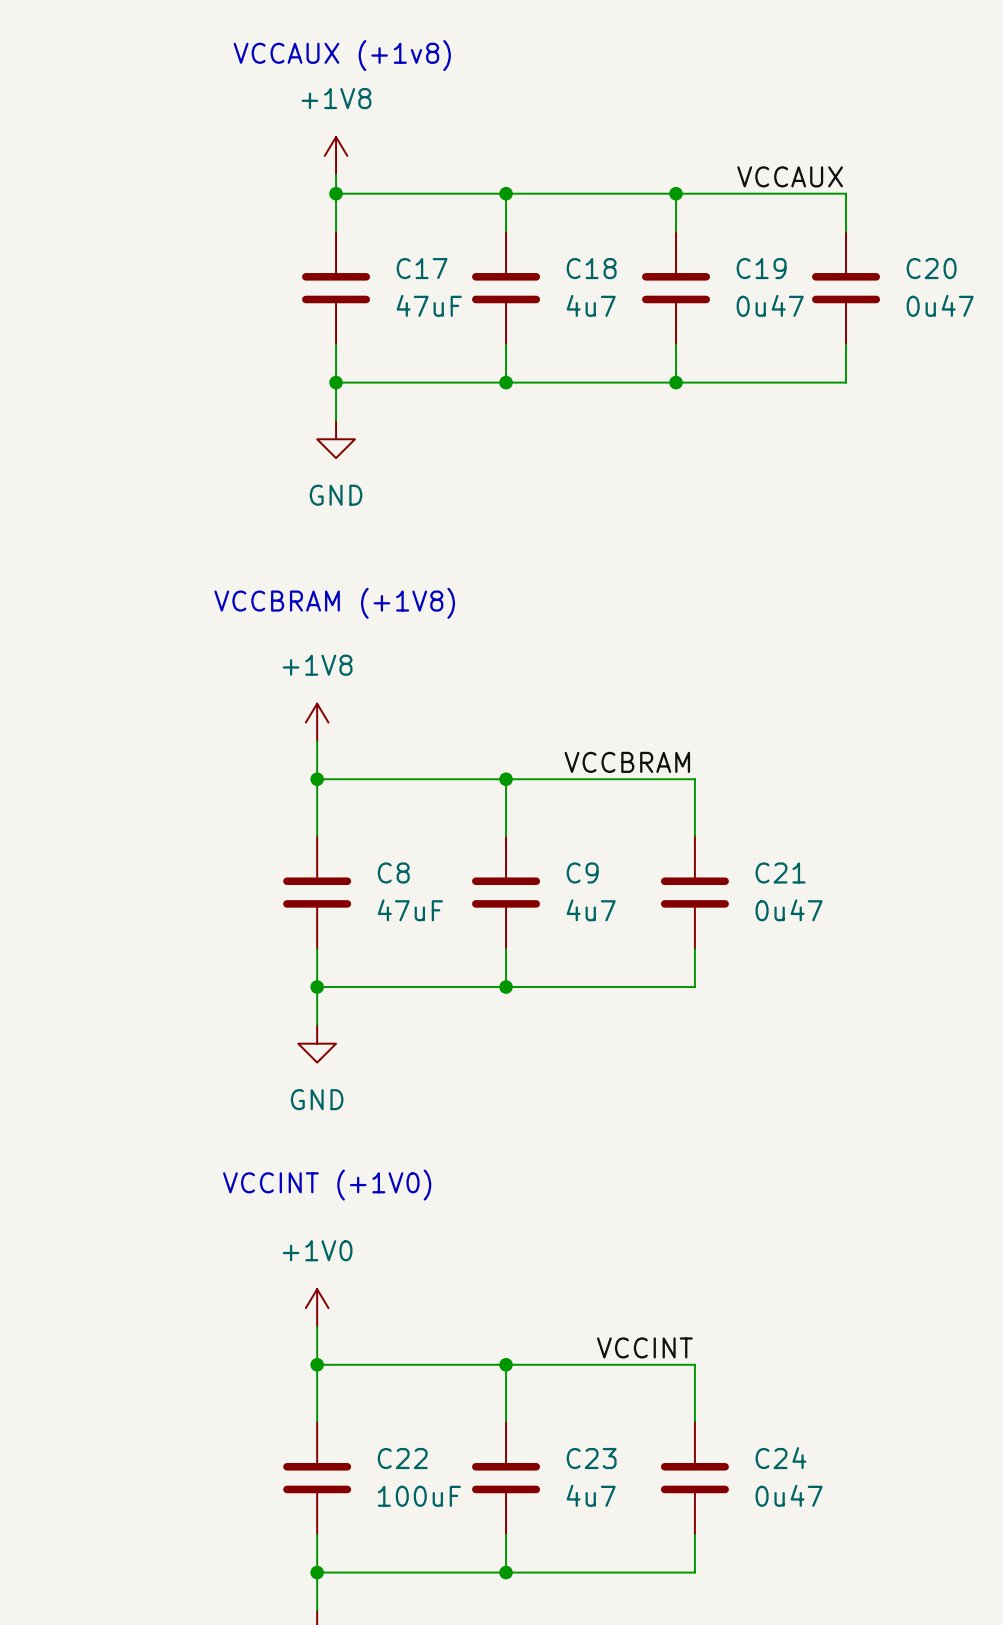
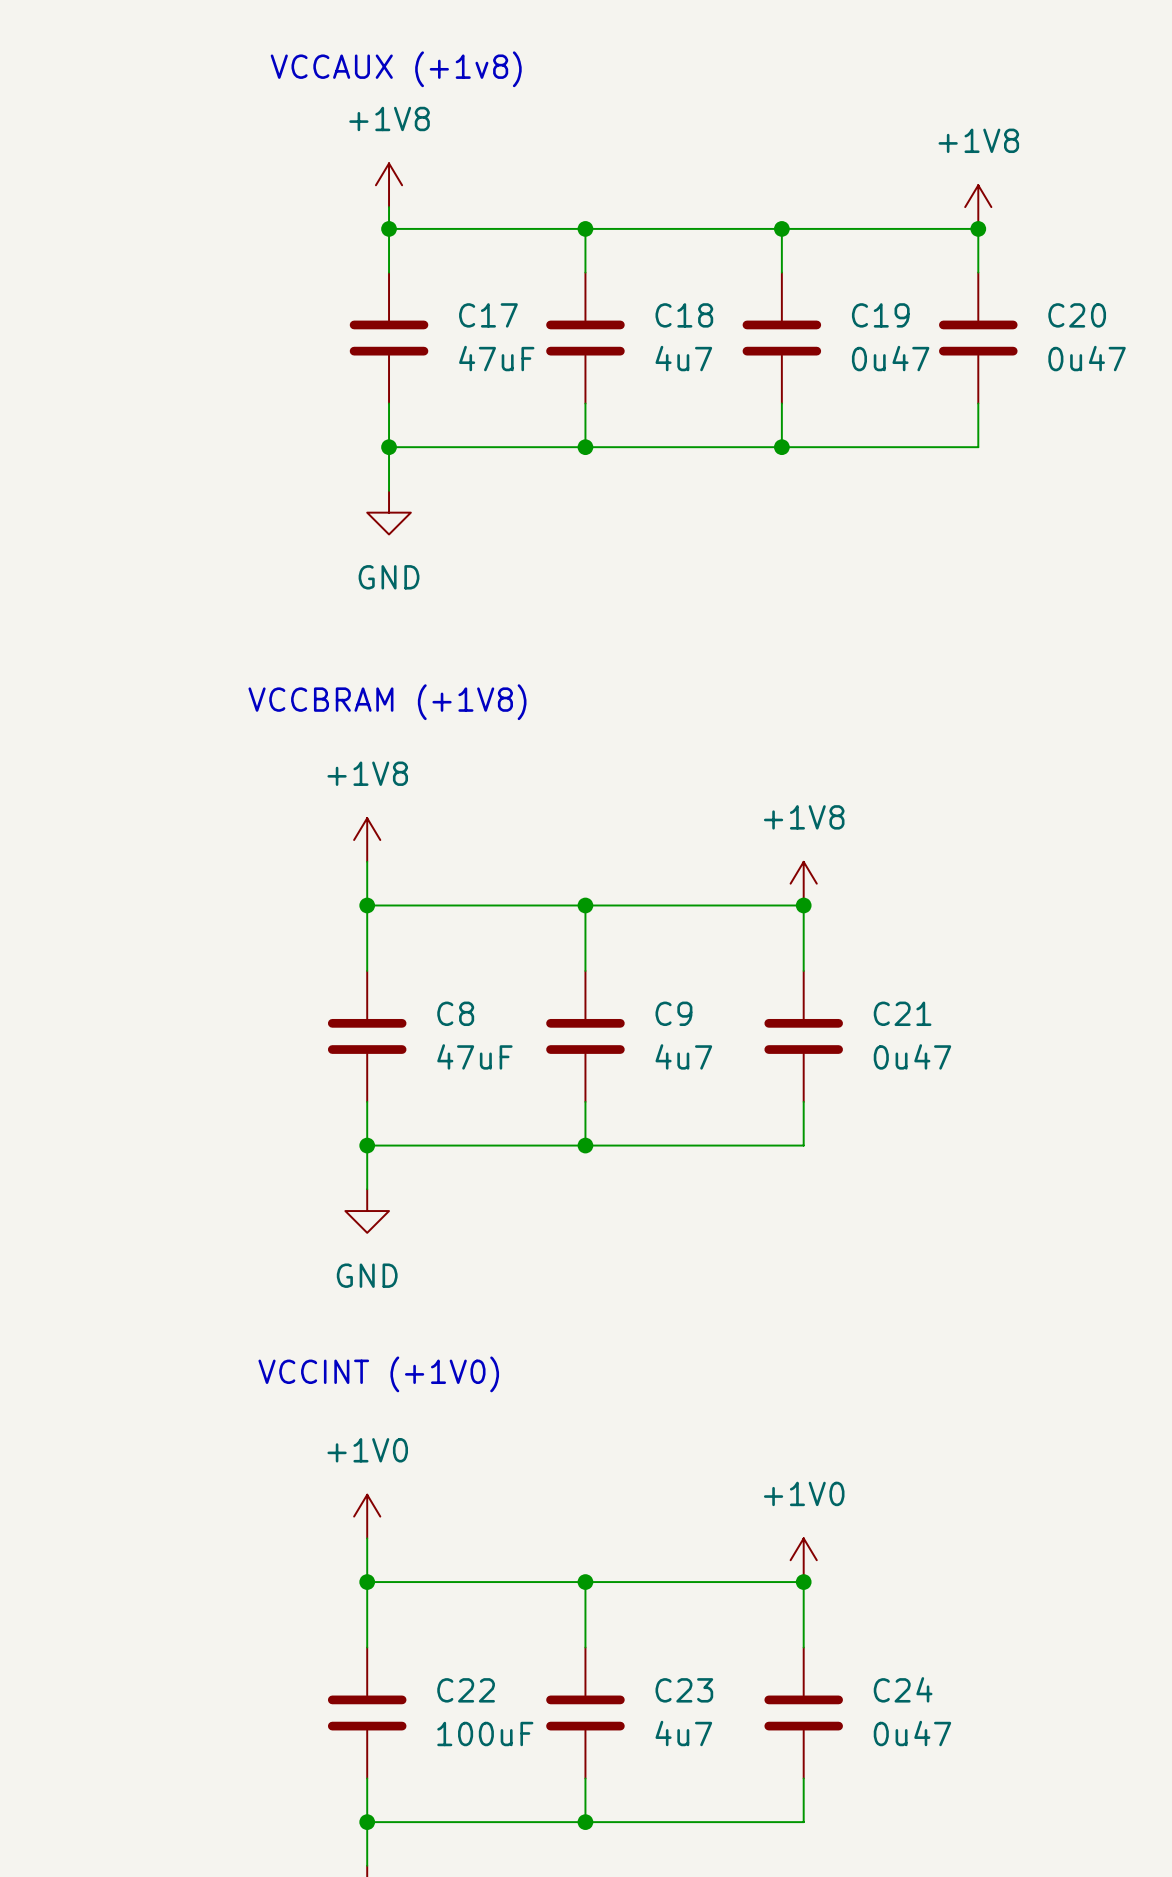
power symbol: none -> +1V8 (978, 207)
label: VCCAUX (790, 176) -> none
junction: none -> (978, 228)
power symbol: none -> +1V8 (803, 883)
label: VCCBRAM (627, 762) -> none
junction: none -> (803, 905)
power symbol: none -> +1V0 (803, 1560)
label: VCCINT (644, 1347) -> none
junction: none -> (803, 1582)

